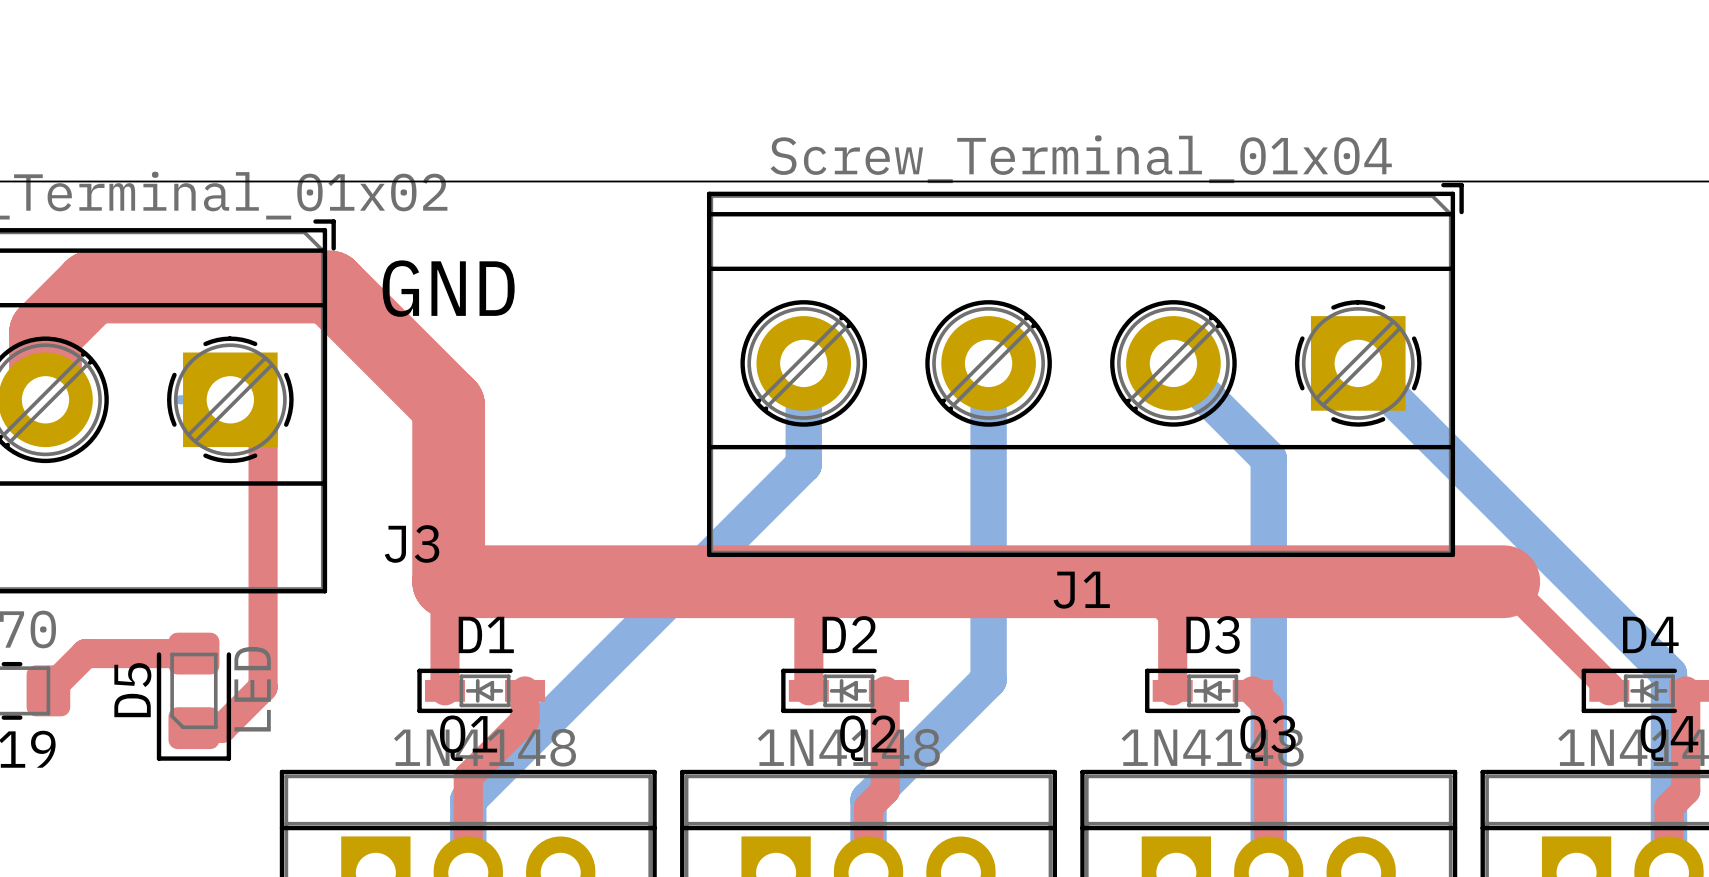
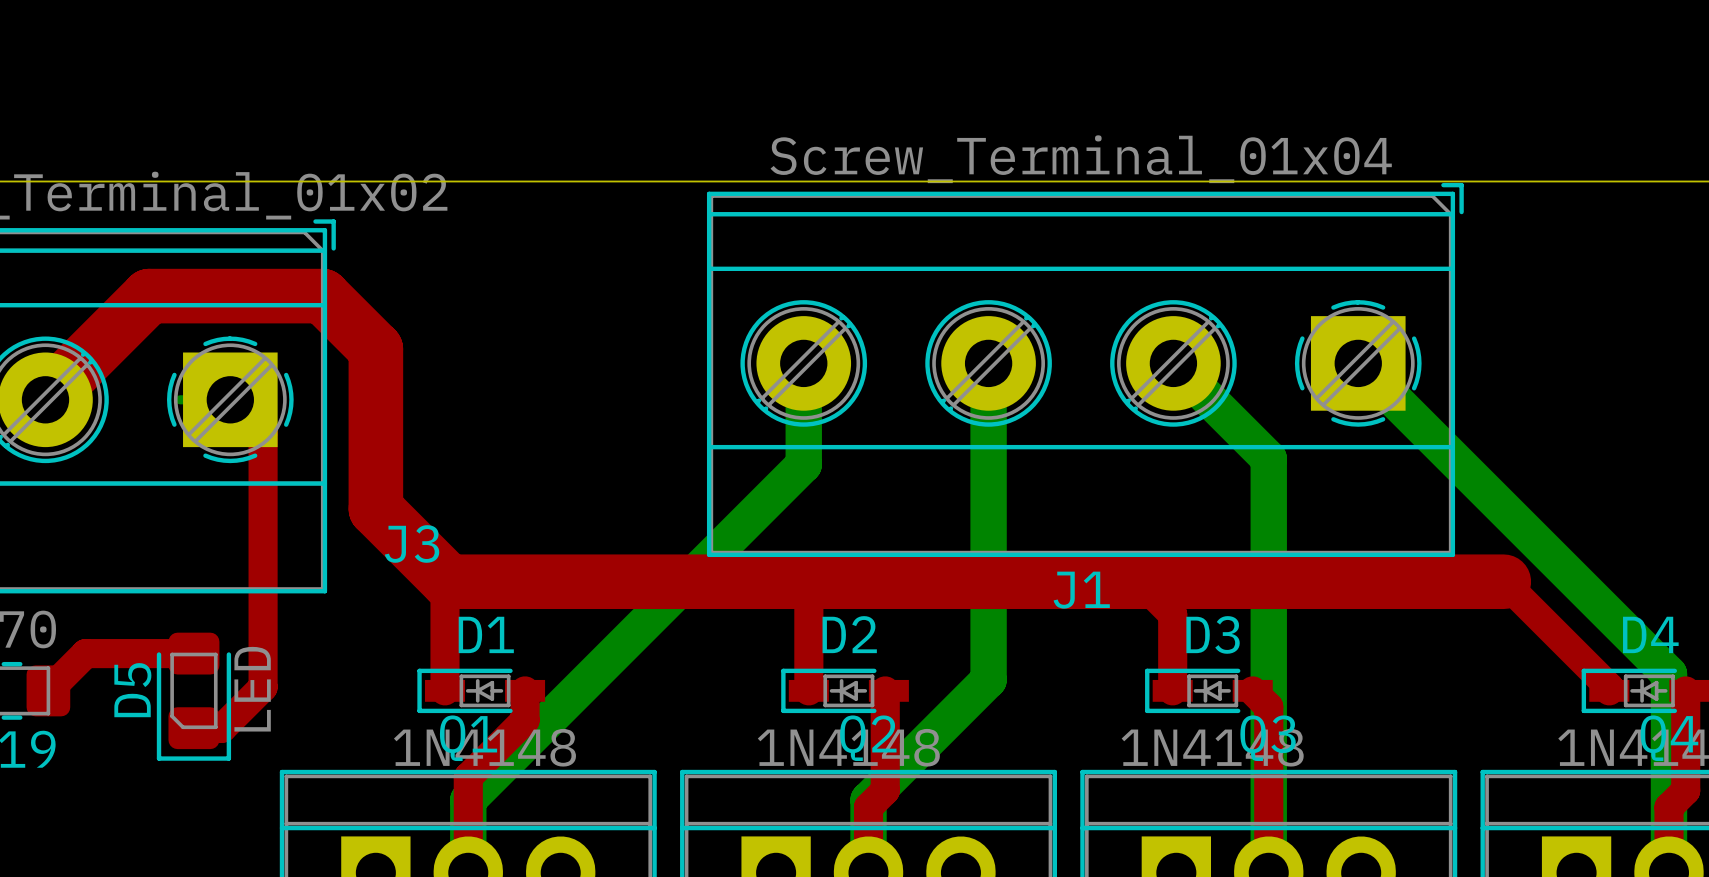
text: GND (448, 288) -> none
top track: (45, 399) (45, 332) (91, 287) (330, 287) (448, 405) (448, 581) -> (45, 399) (149, 296) (322, 296) (375, 349) (375, 508) (448, 581)
top track width: thick (448, 581) (1503, 581) -> thin (448, 581) (1503, 581)

